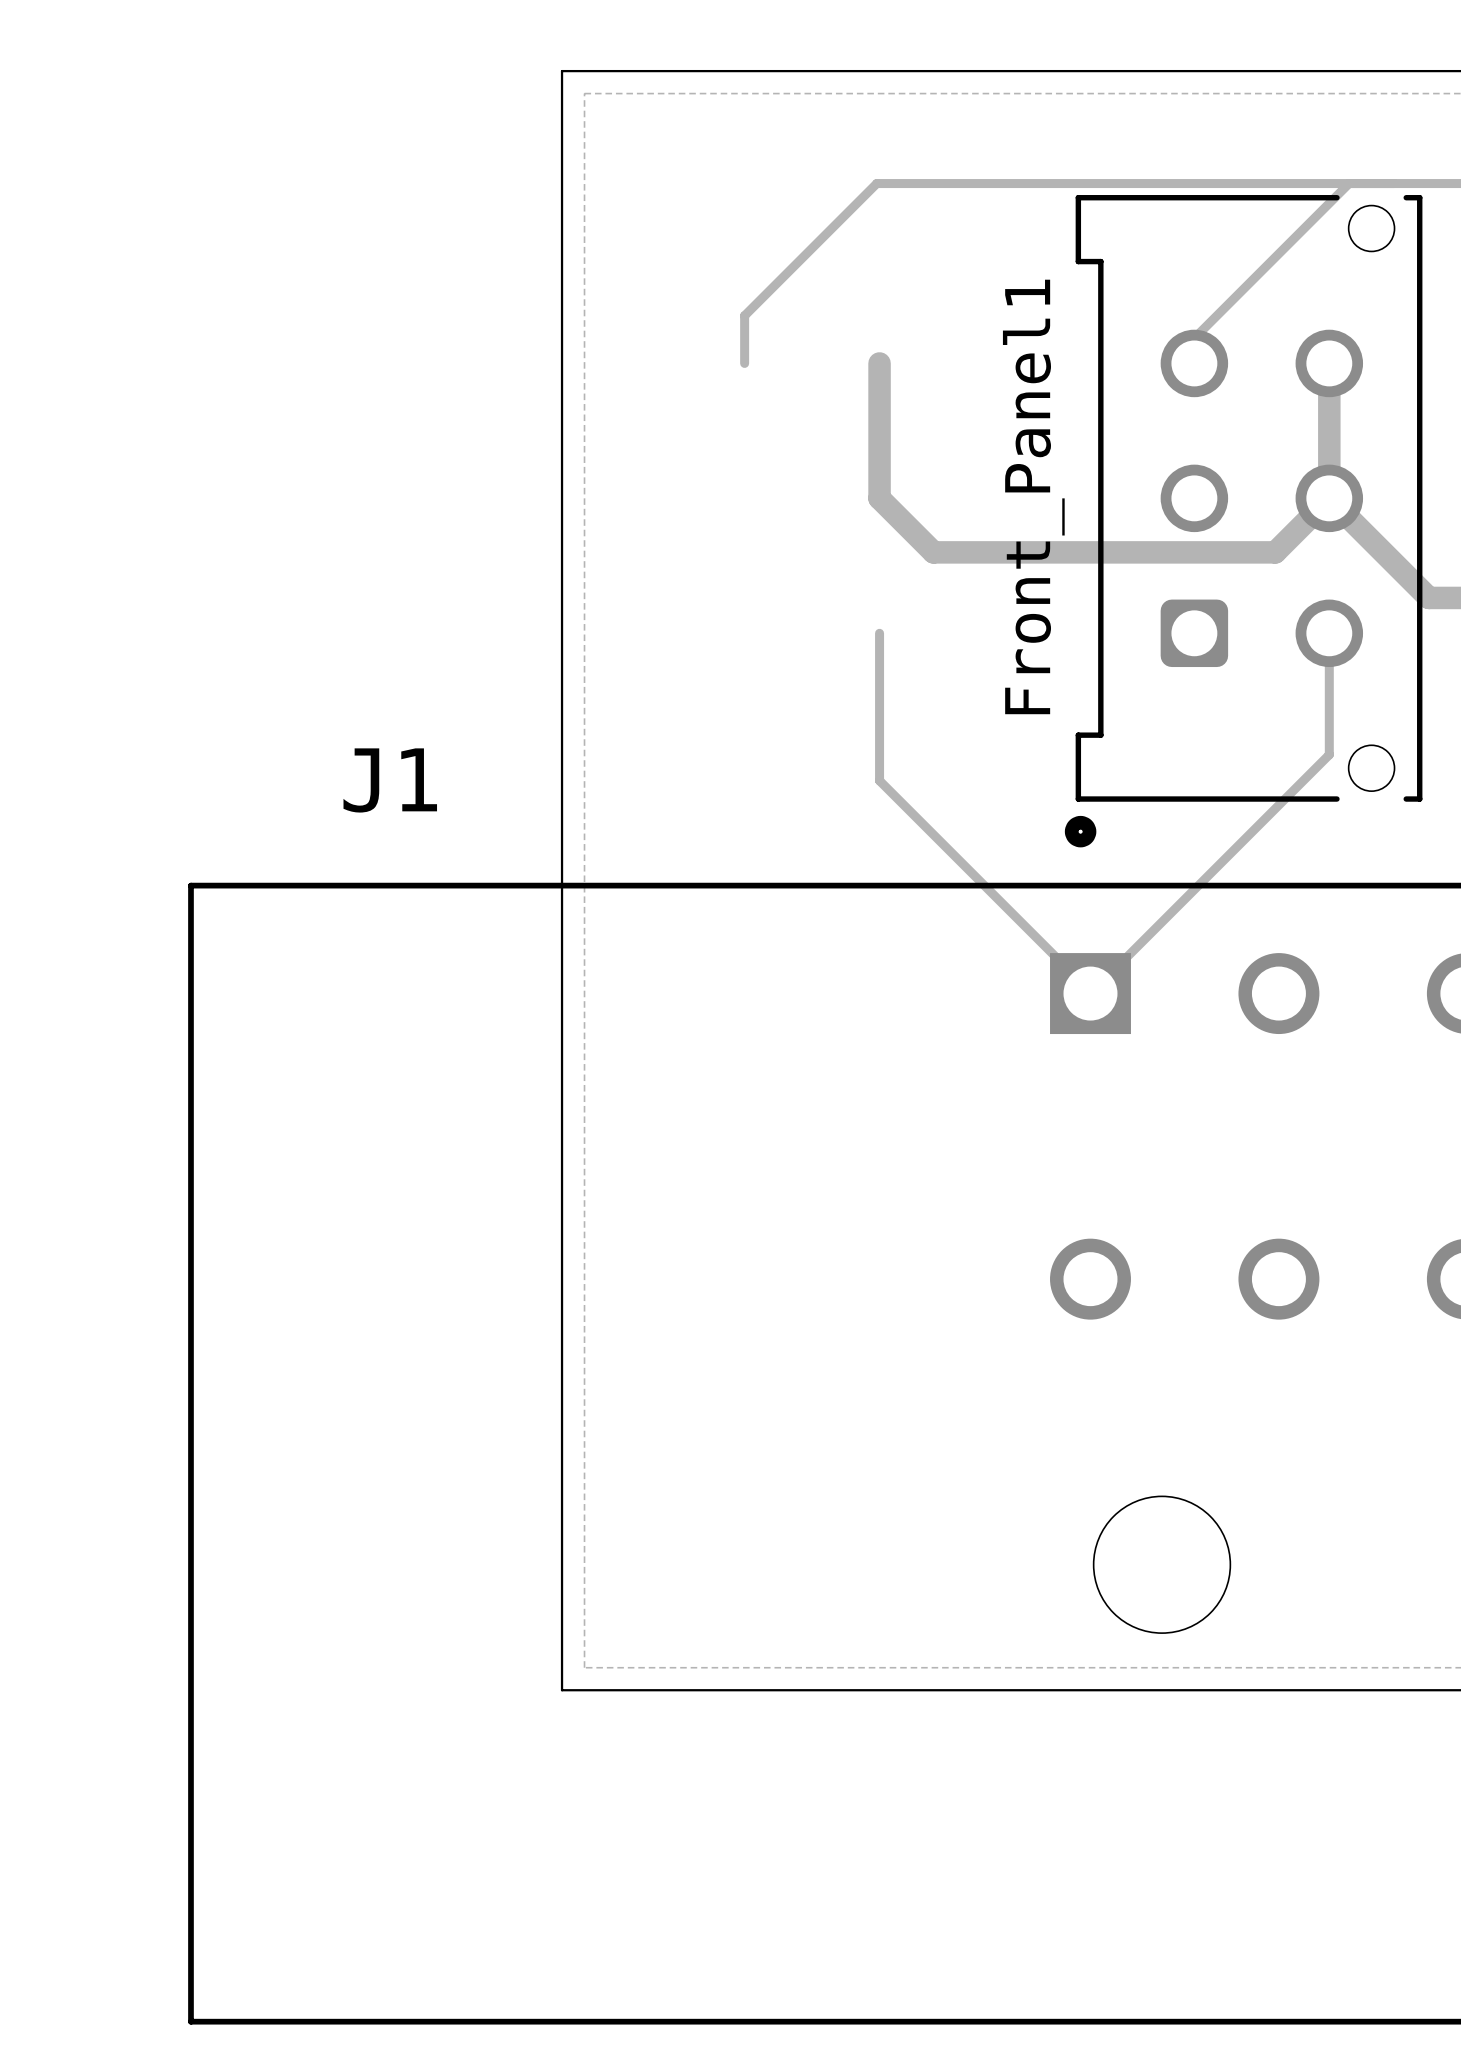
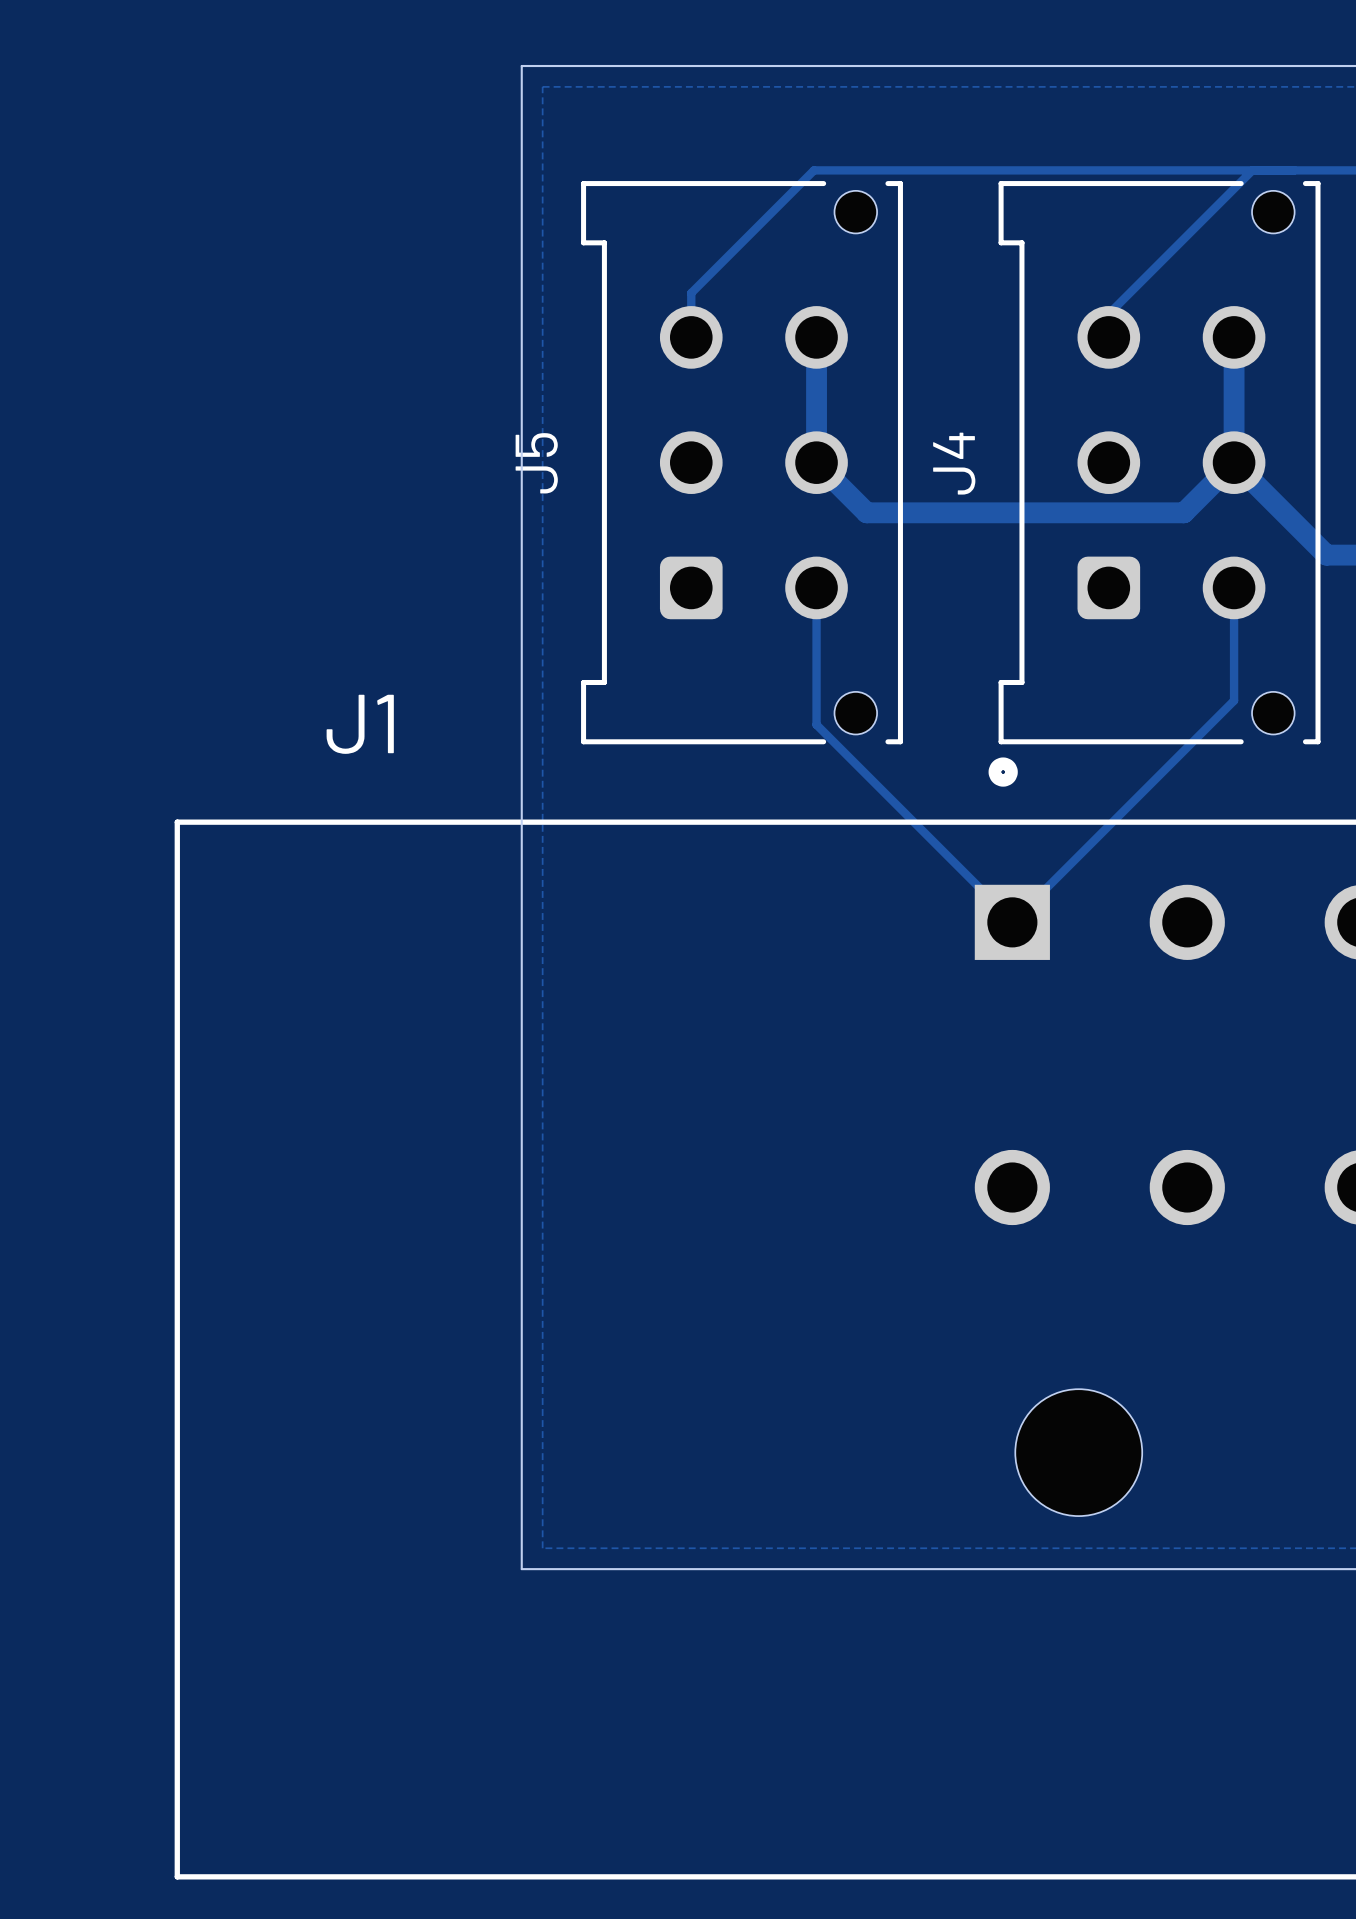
Front_Panel1 name: Front_Panel1 (1033, 496) -> J4 (954, 463)
J5: none -> (742, 462)

